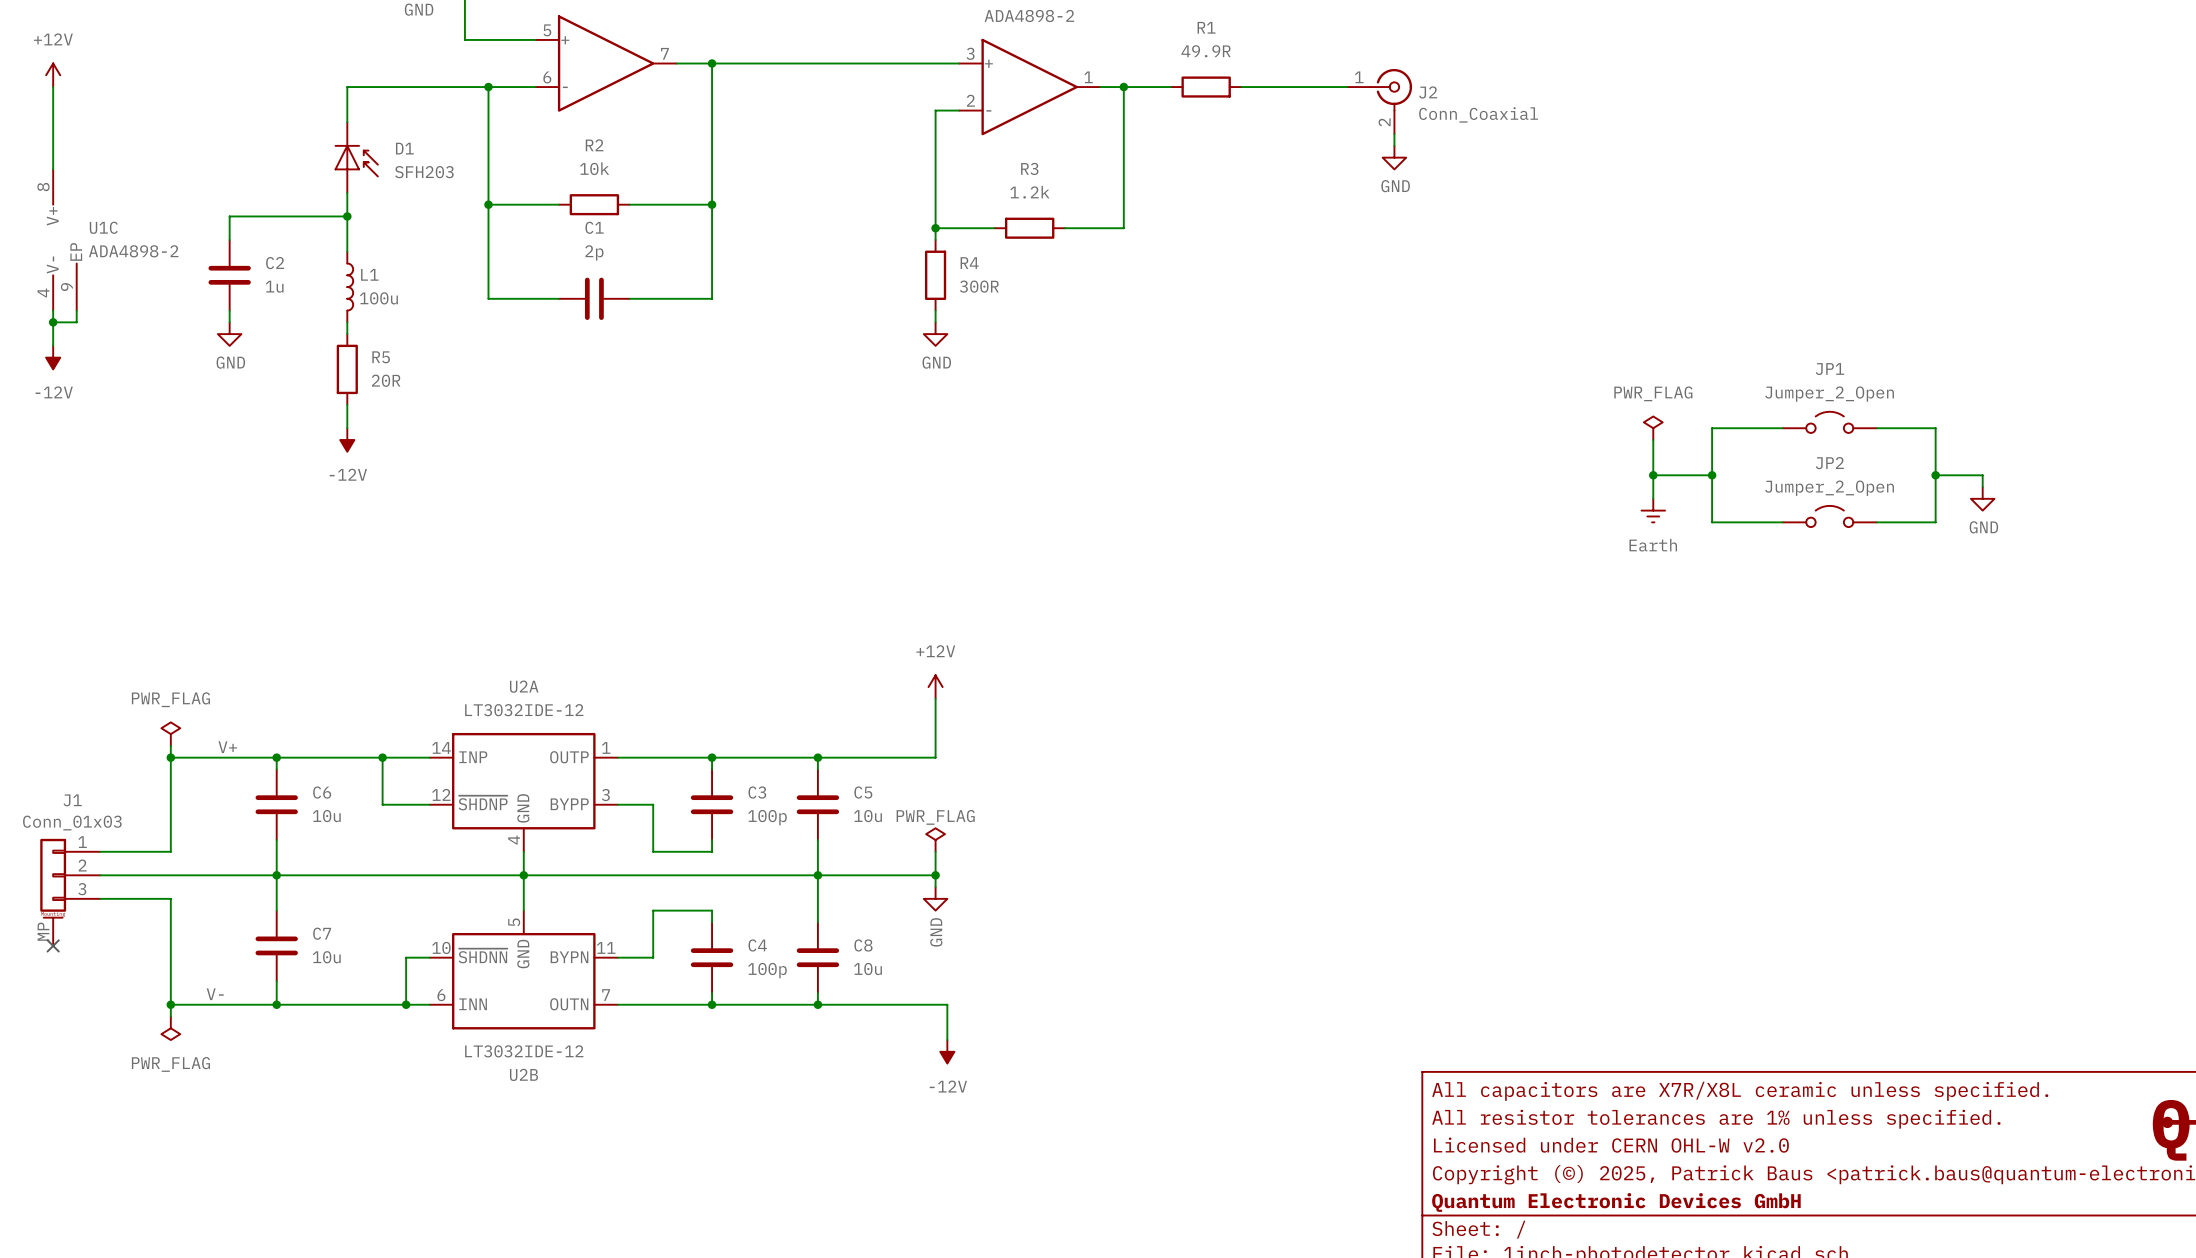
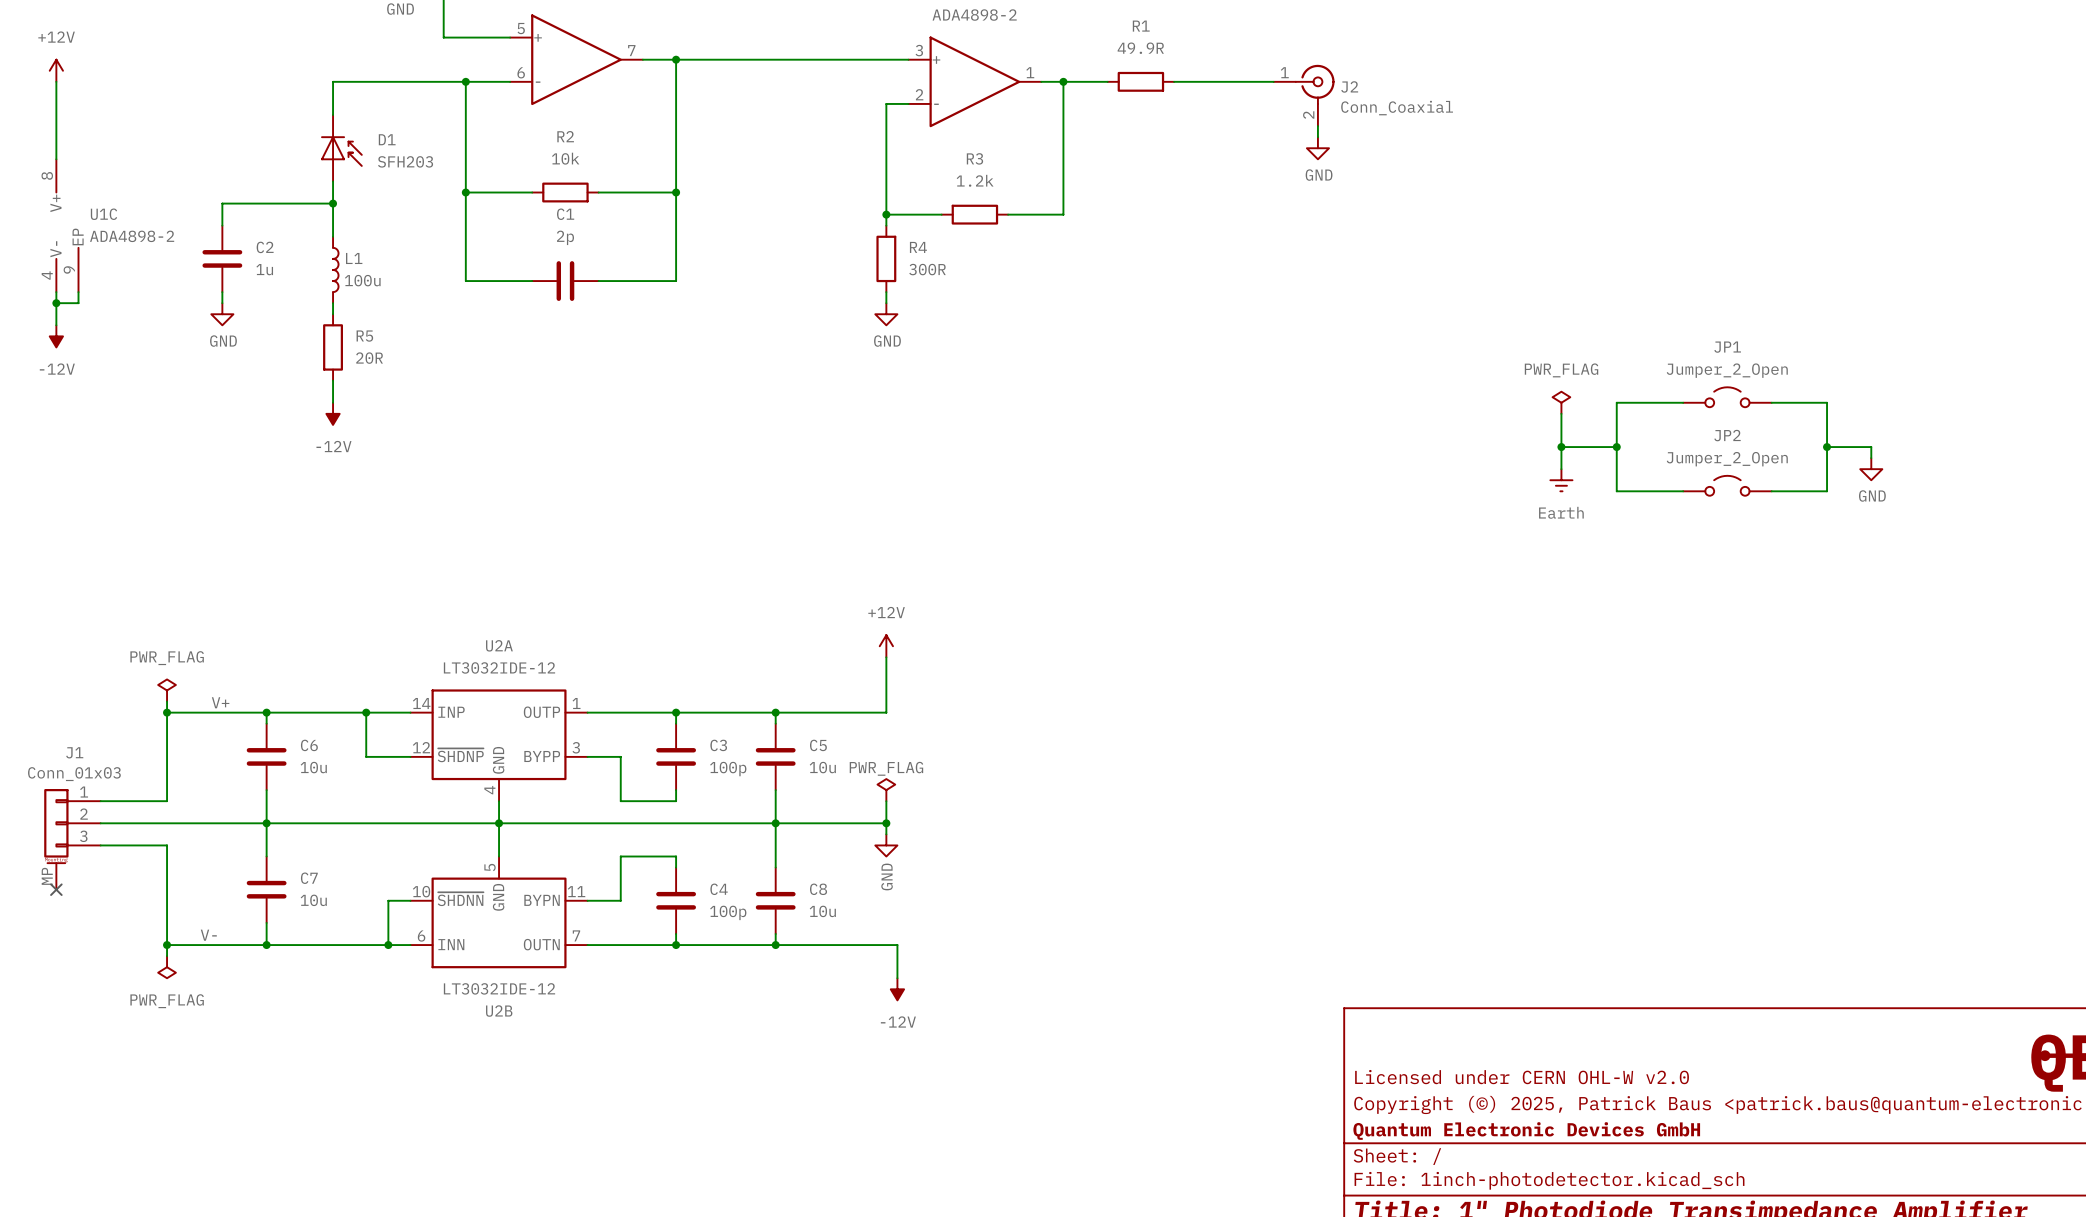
title block: All capacitors are X7R/X8L ceramic unless specified. (1740, 1091) -> none
title block: All resistor tolerances are 1% unless specified. (1716, 1119) -> none

